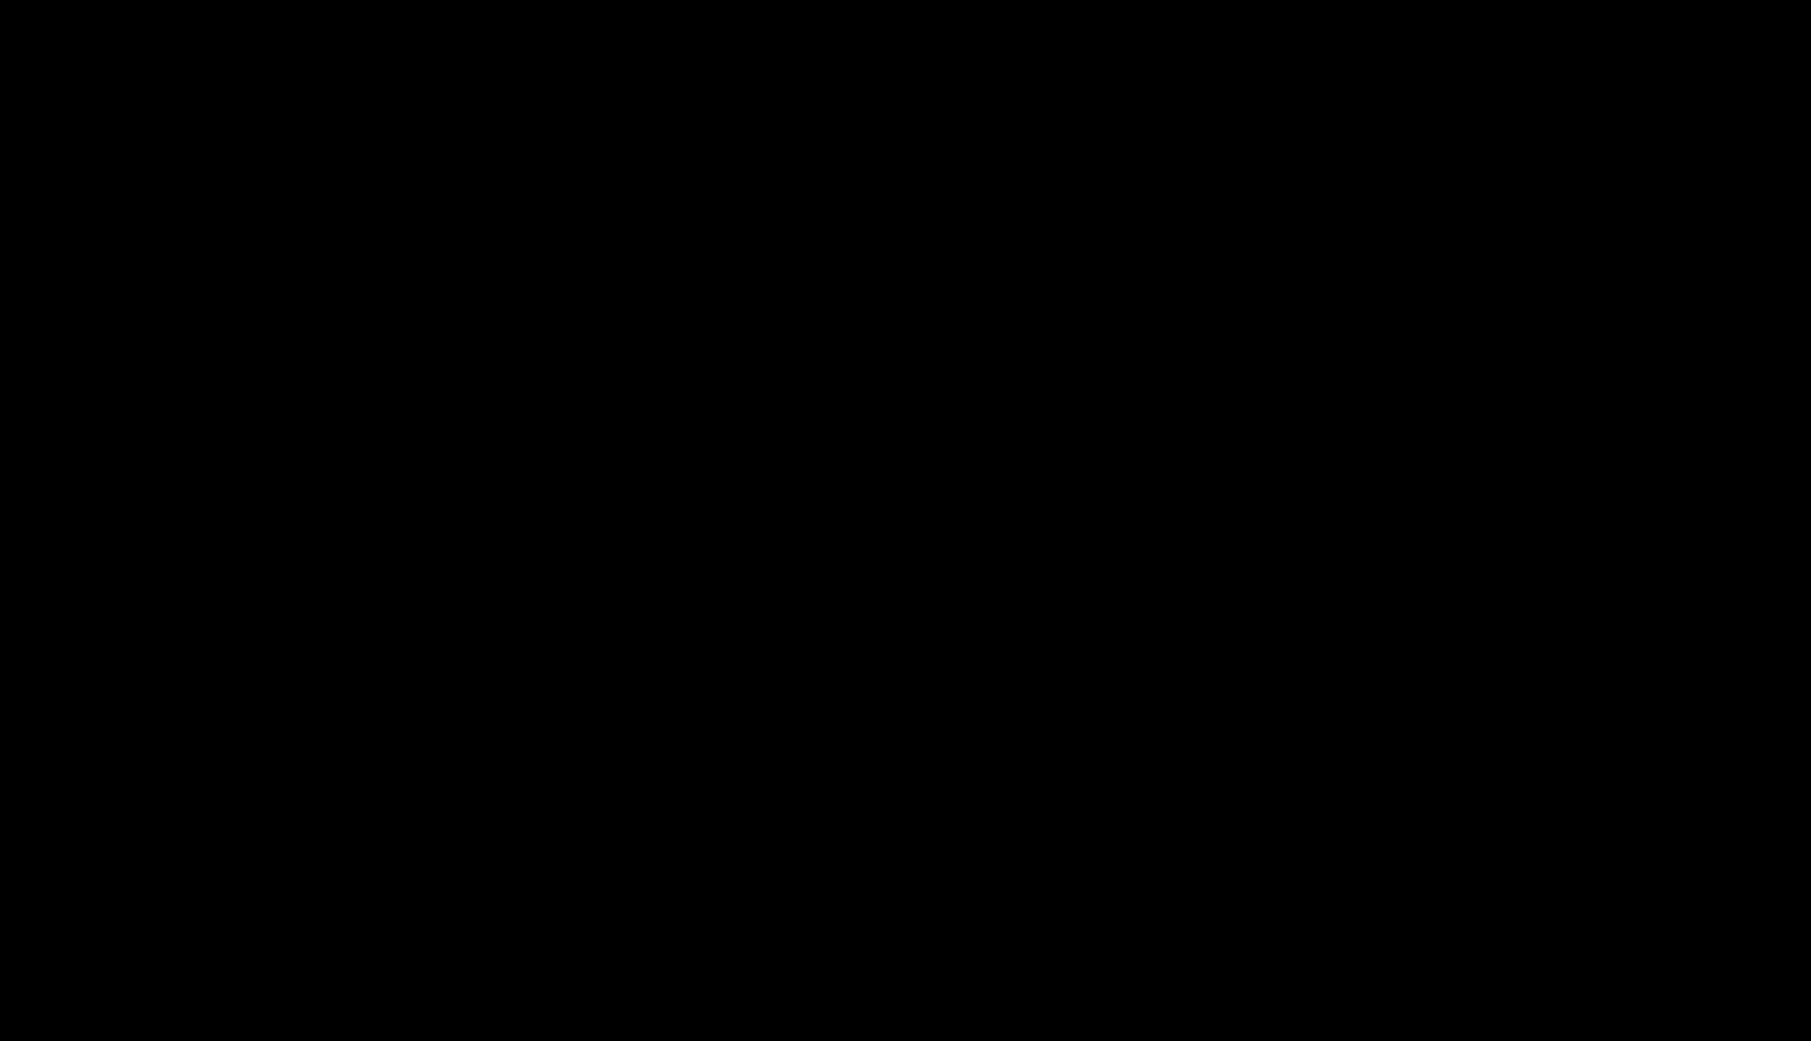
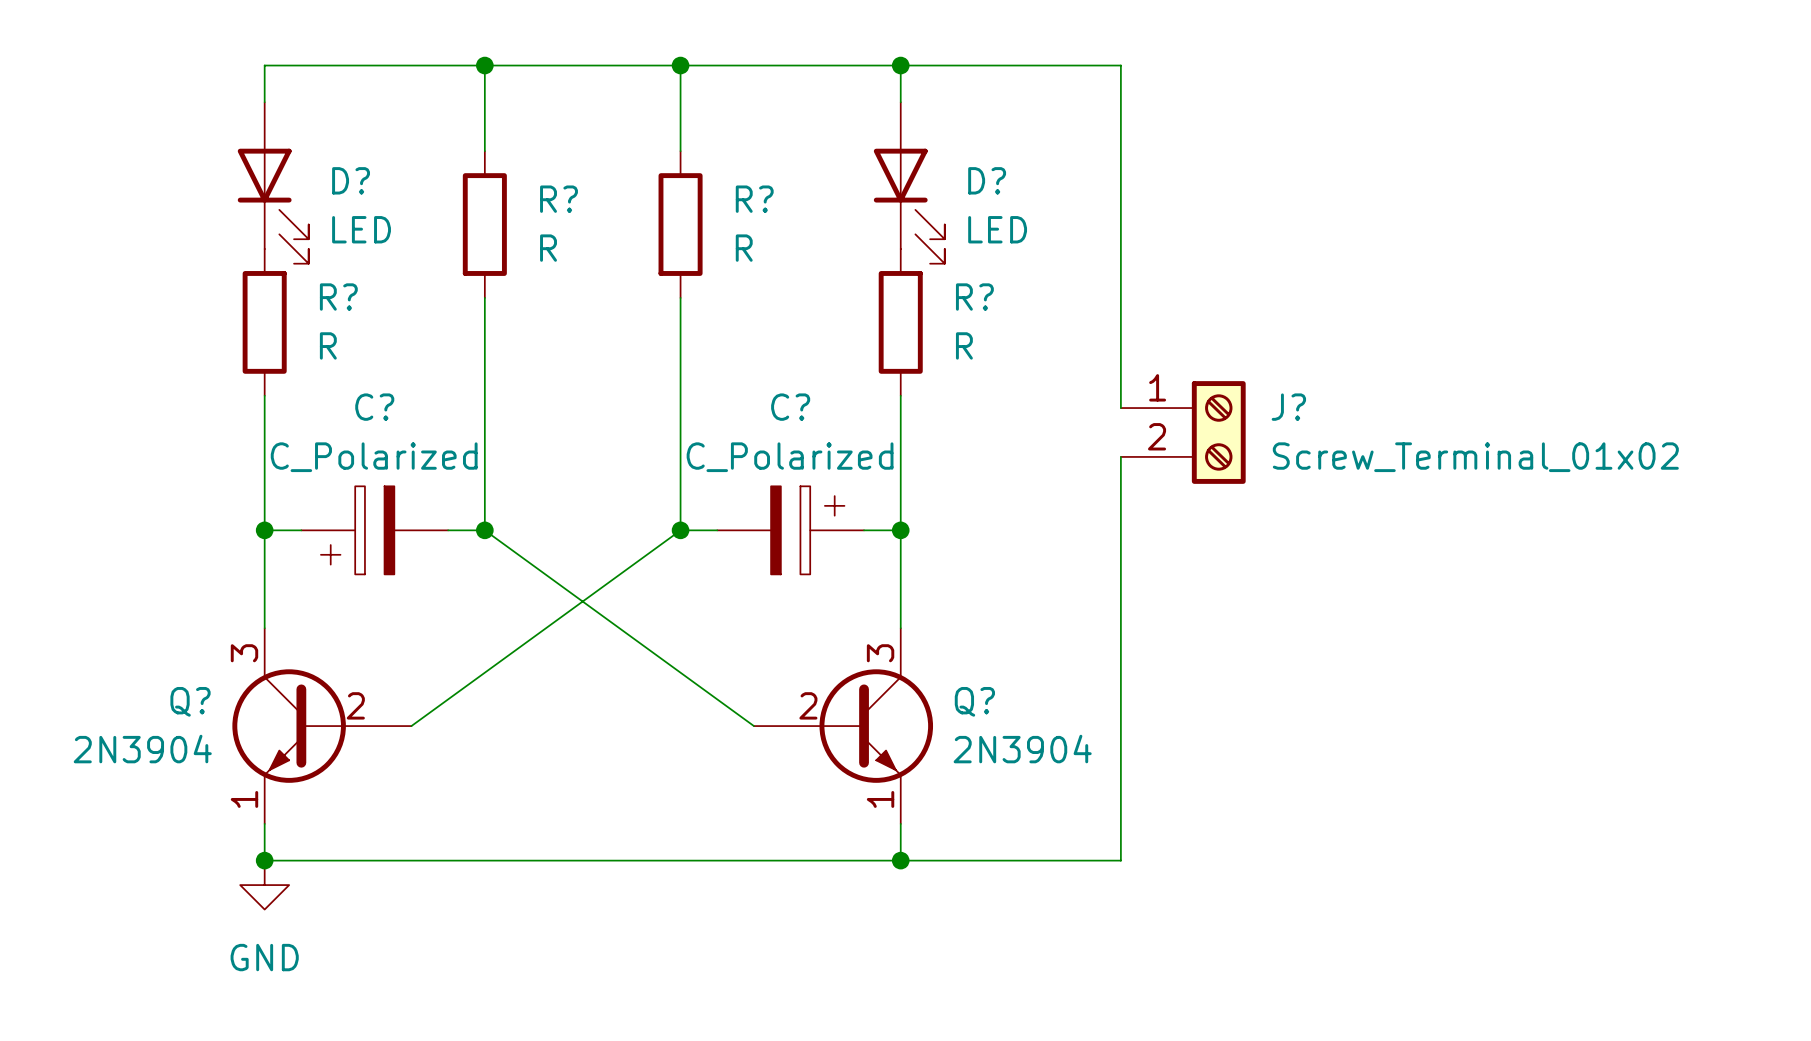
wire: none -> (484, 65) (484, 151)
junction: none -> (484, 65)
wire: none -> (680, 65) (680, 151)
junction: none -> (680, 65)
wire: none -> (900, 65) (900, 102)
junction: none -> (900, 65)
wire: none -> (264, 102) (264, 65) (1120, 65) (1120, 408)
D?: none -> LED (273, 182)
D?: none -> LED (909, 182)
R?: none -> R (484, 224)
R?: none -> R (680, 224)
wire: none -> (484, 297) (484, 530)
wire: none -> (680, 297) (680, 530)
R?: none -> R (264, 322)
R?: none -> R (900, 322)
wire: none -> (264, 395) (264, 628)
wire: none -> (900, 395) (900, 628)
J?: none -> Screw_Terminal_01x02 (1183, 432)
wire: none -> (1120, 456) (1120, 860) (264, 860) (264, 823)
wire: none -> (264, 530) (301, 530)
junction: none -> (264, 530)
C?: none -> C_Polarized (374, 530)
wire: none -> (448, 530) (484, 530)
wire: none -> (484, 530) (753, 726)
junction: none -> (484, 530)
wire: none -> (680, 530) (717, 530)
wire: none -> (680, 530) (411, 726)
junction: none -> (680, 530)
C?: none -> C_Polarized (790, 530)
wire: none -> (864, 530) (900, 530)
junction: none -> (900, 530)
Q?: none -> 2N3904 (321, 726)
Q?: none -> 2N3904 (843, 726)
wire: none -> (900, 823) (900, 860)
junction: none -> (264, 860)
junction: none -> (900, 860)
power symbol: none -> GND (264, 885)

